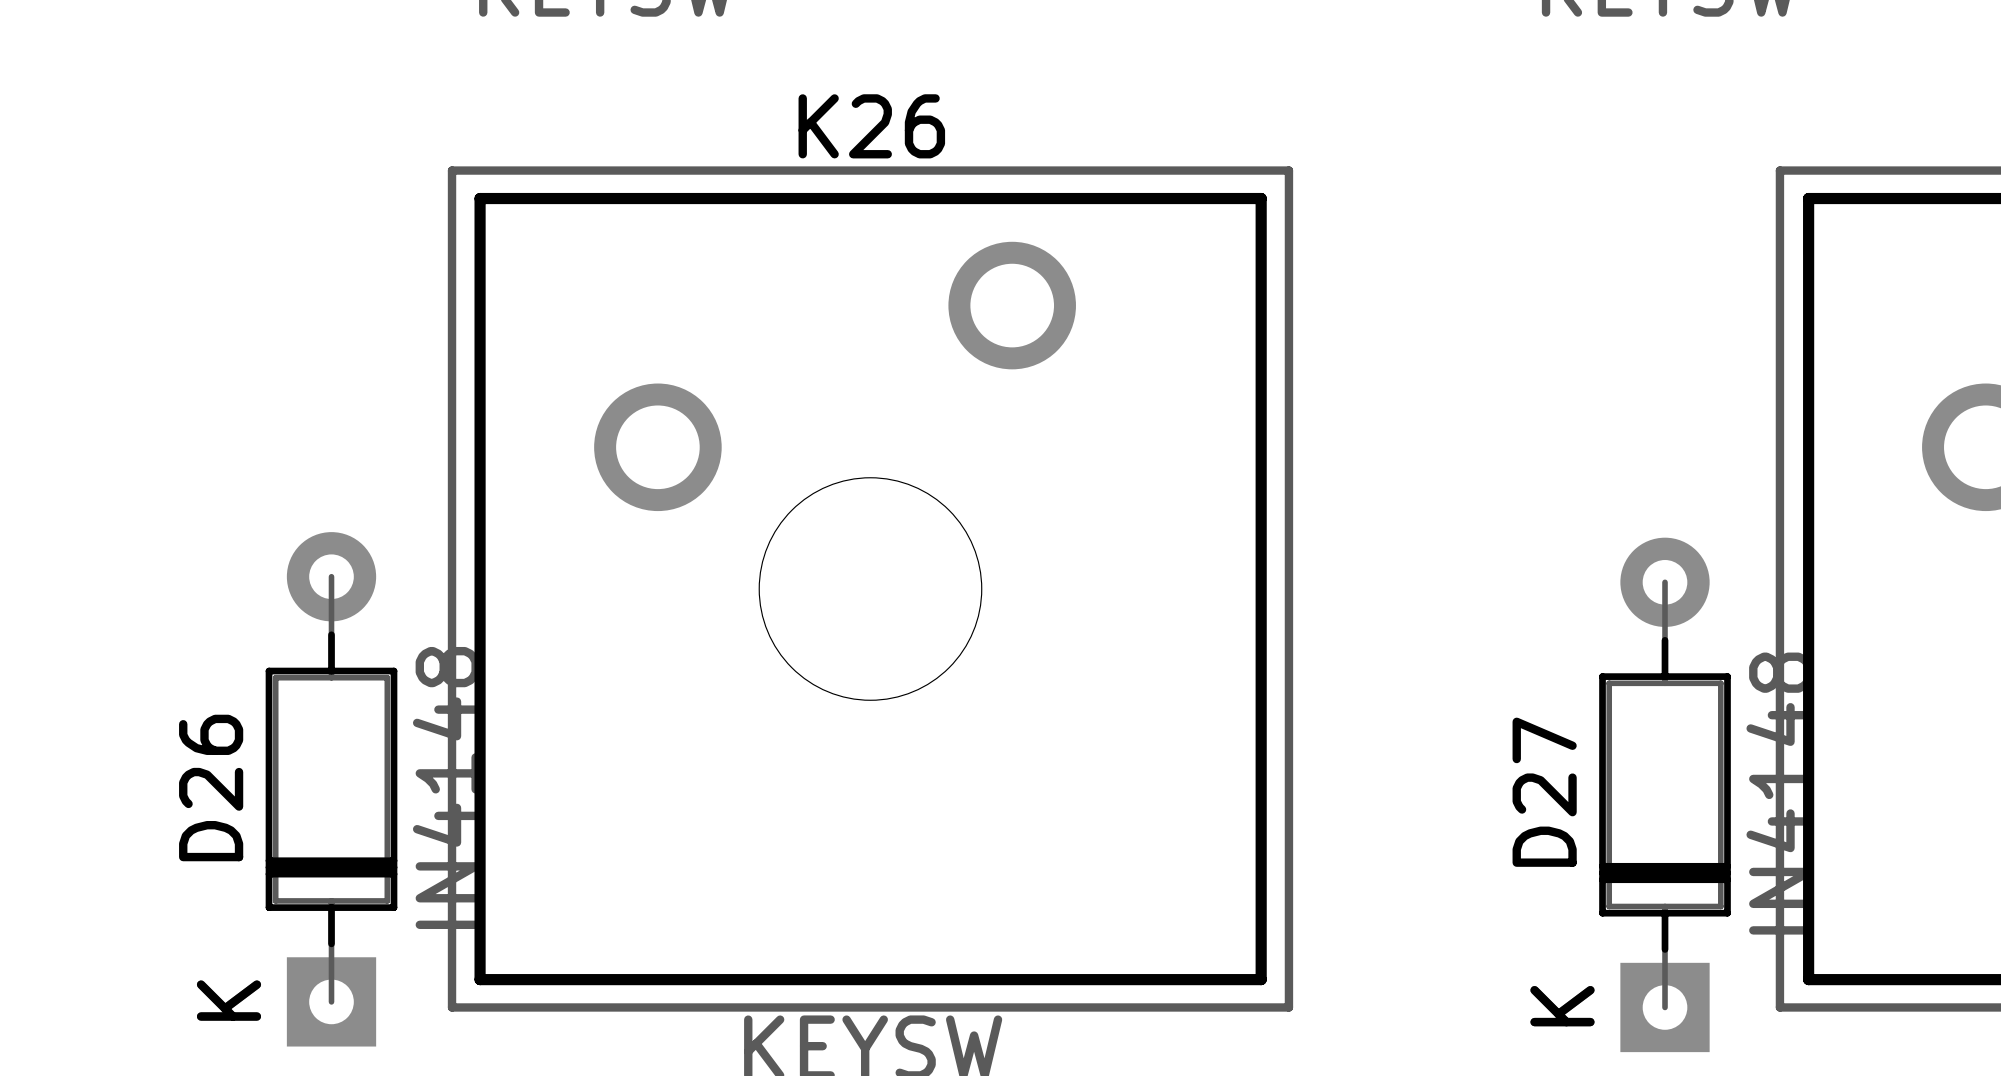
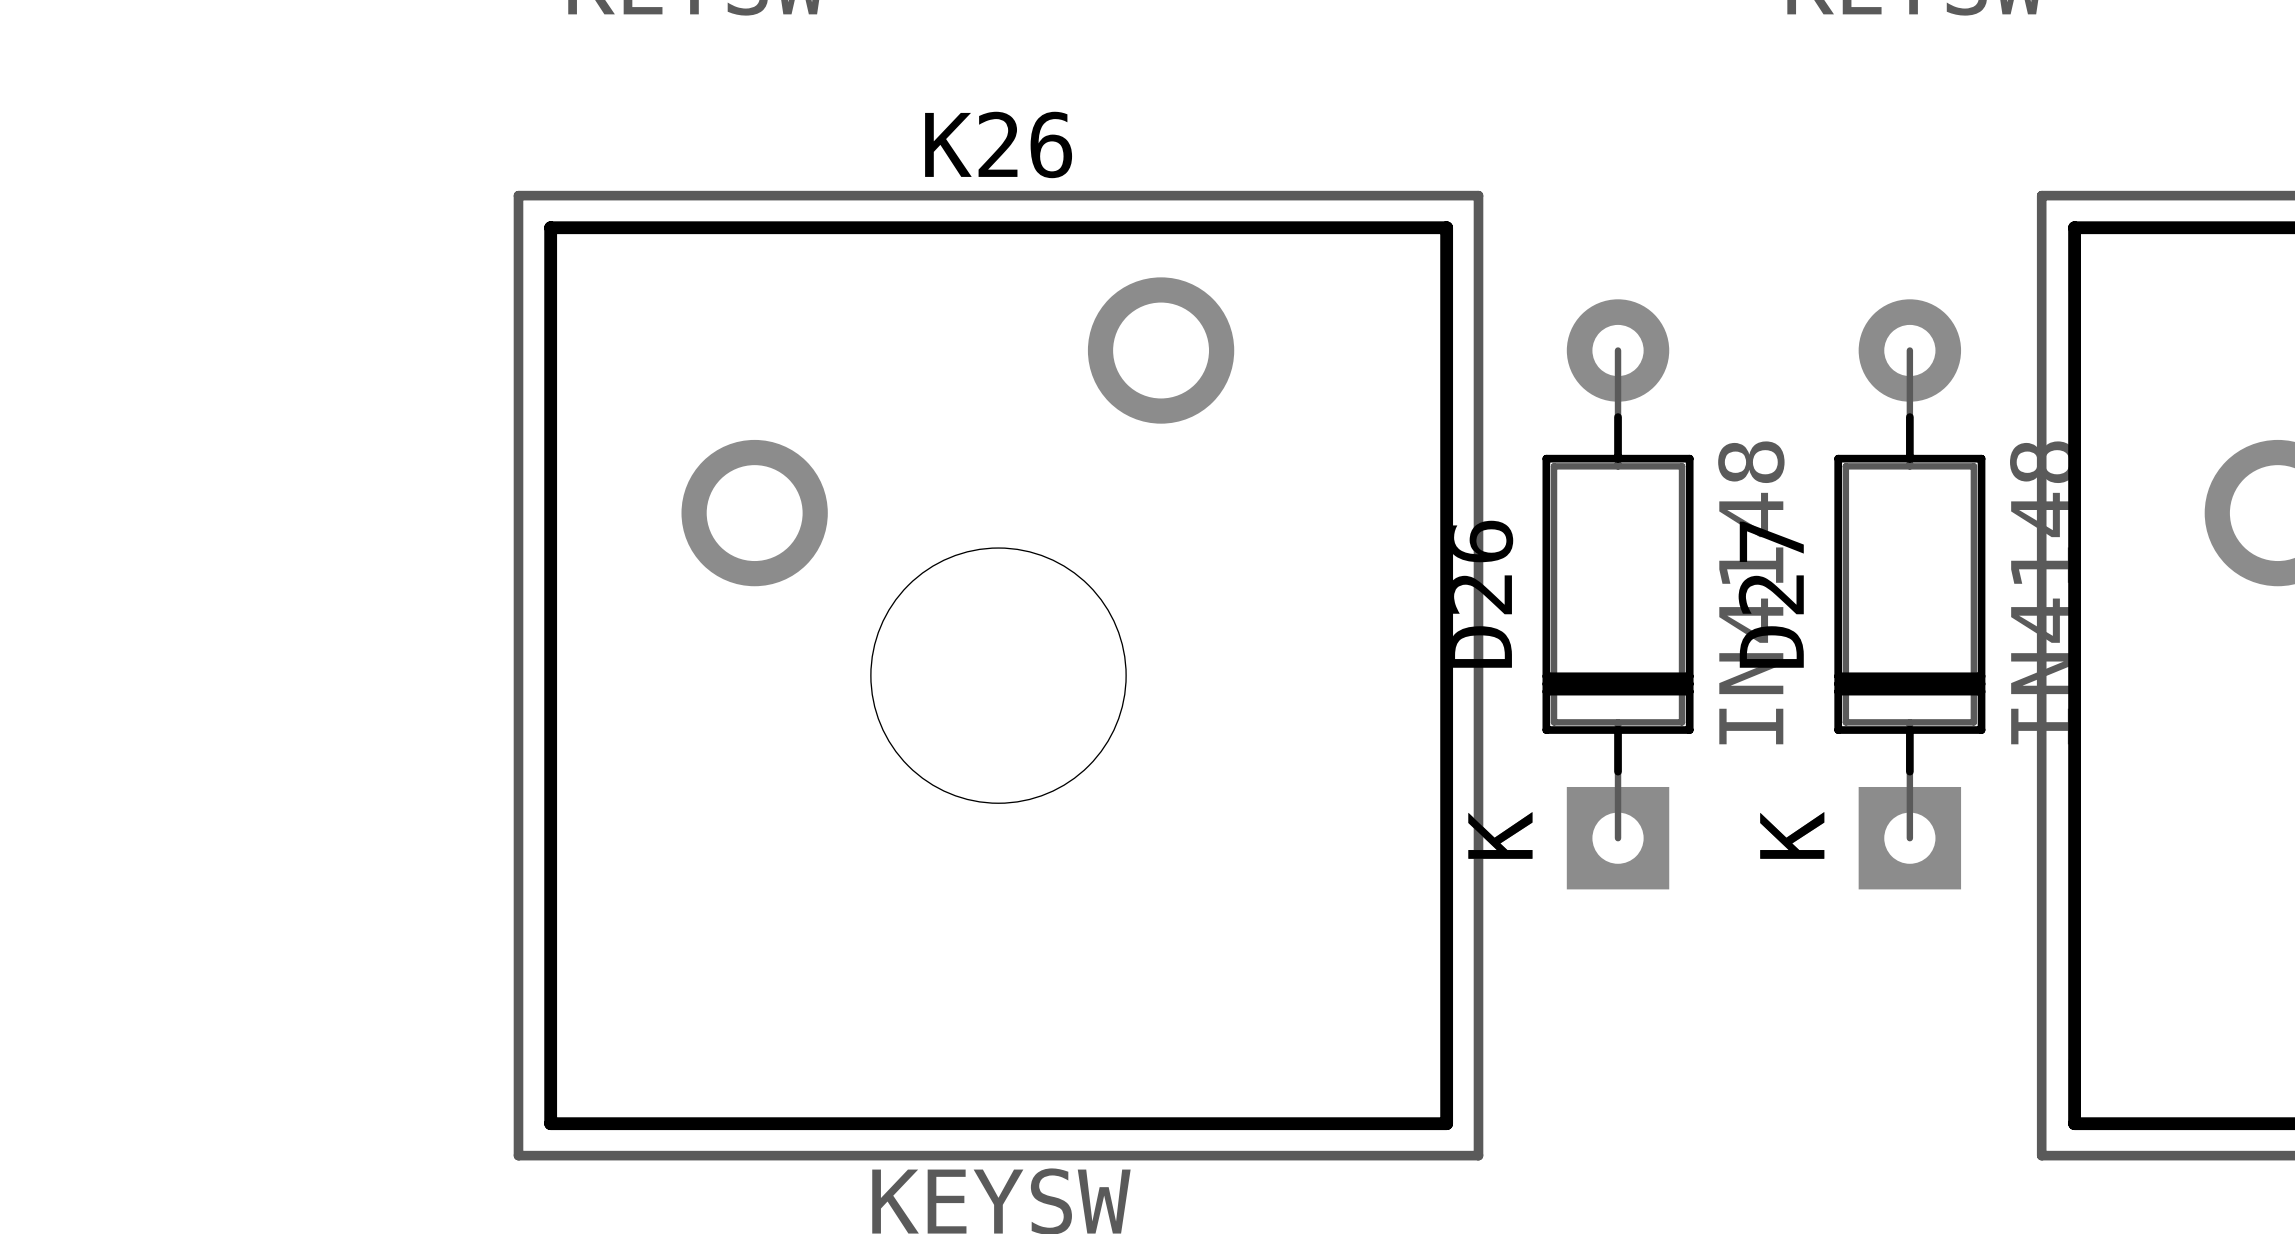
D26 position: (331, 789) -> (1618, 594)
D27 position: (1665, 794) -> (1909, 594)

